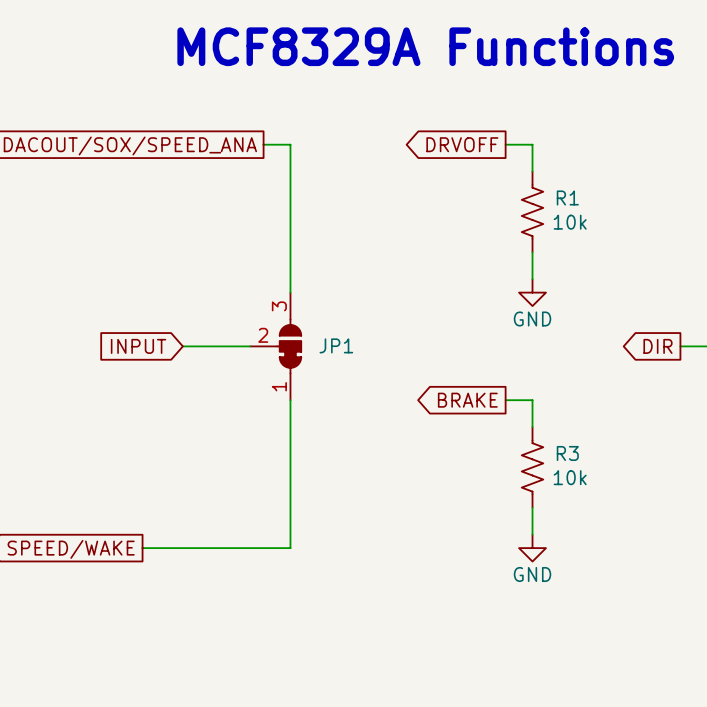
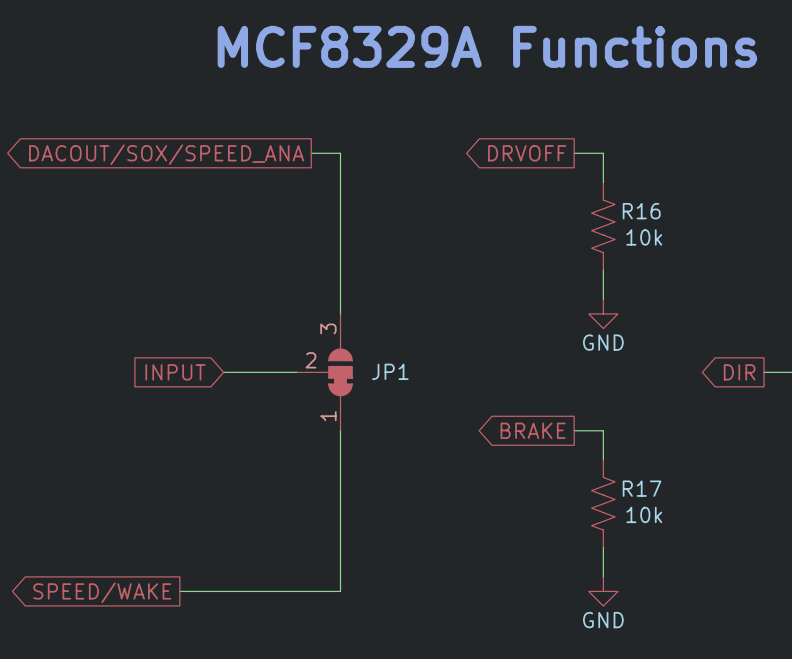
R1 name: R1 (567, 197) -> R16 (641, 211)
R3 name: R3 (567, 453) -> R17 (642, 488)

